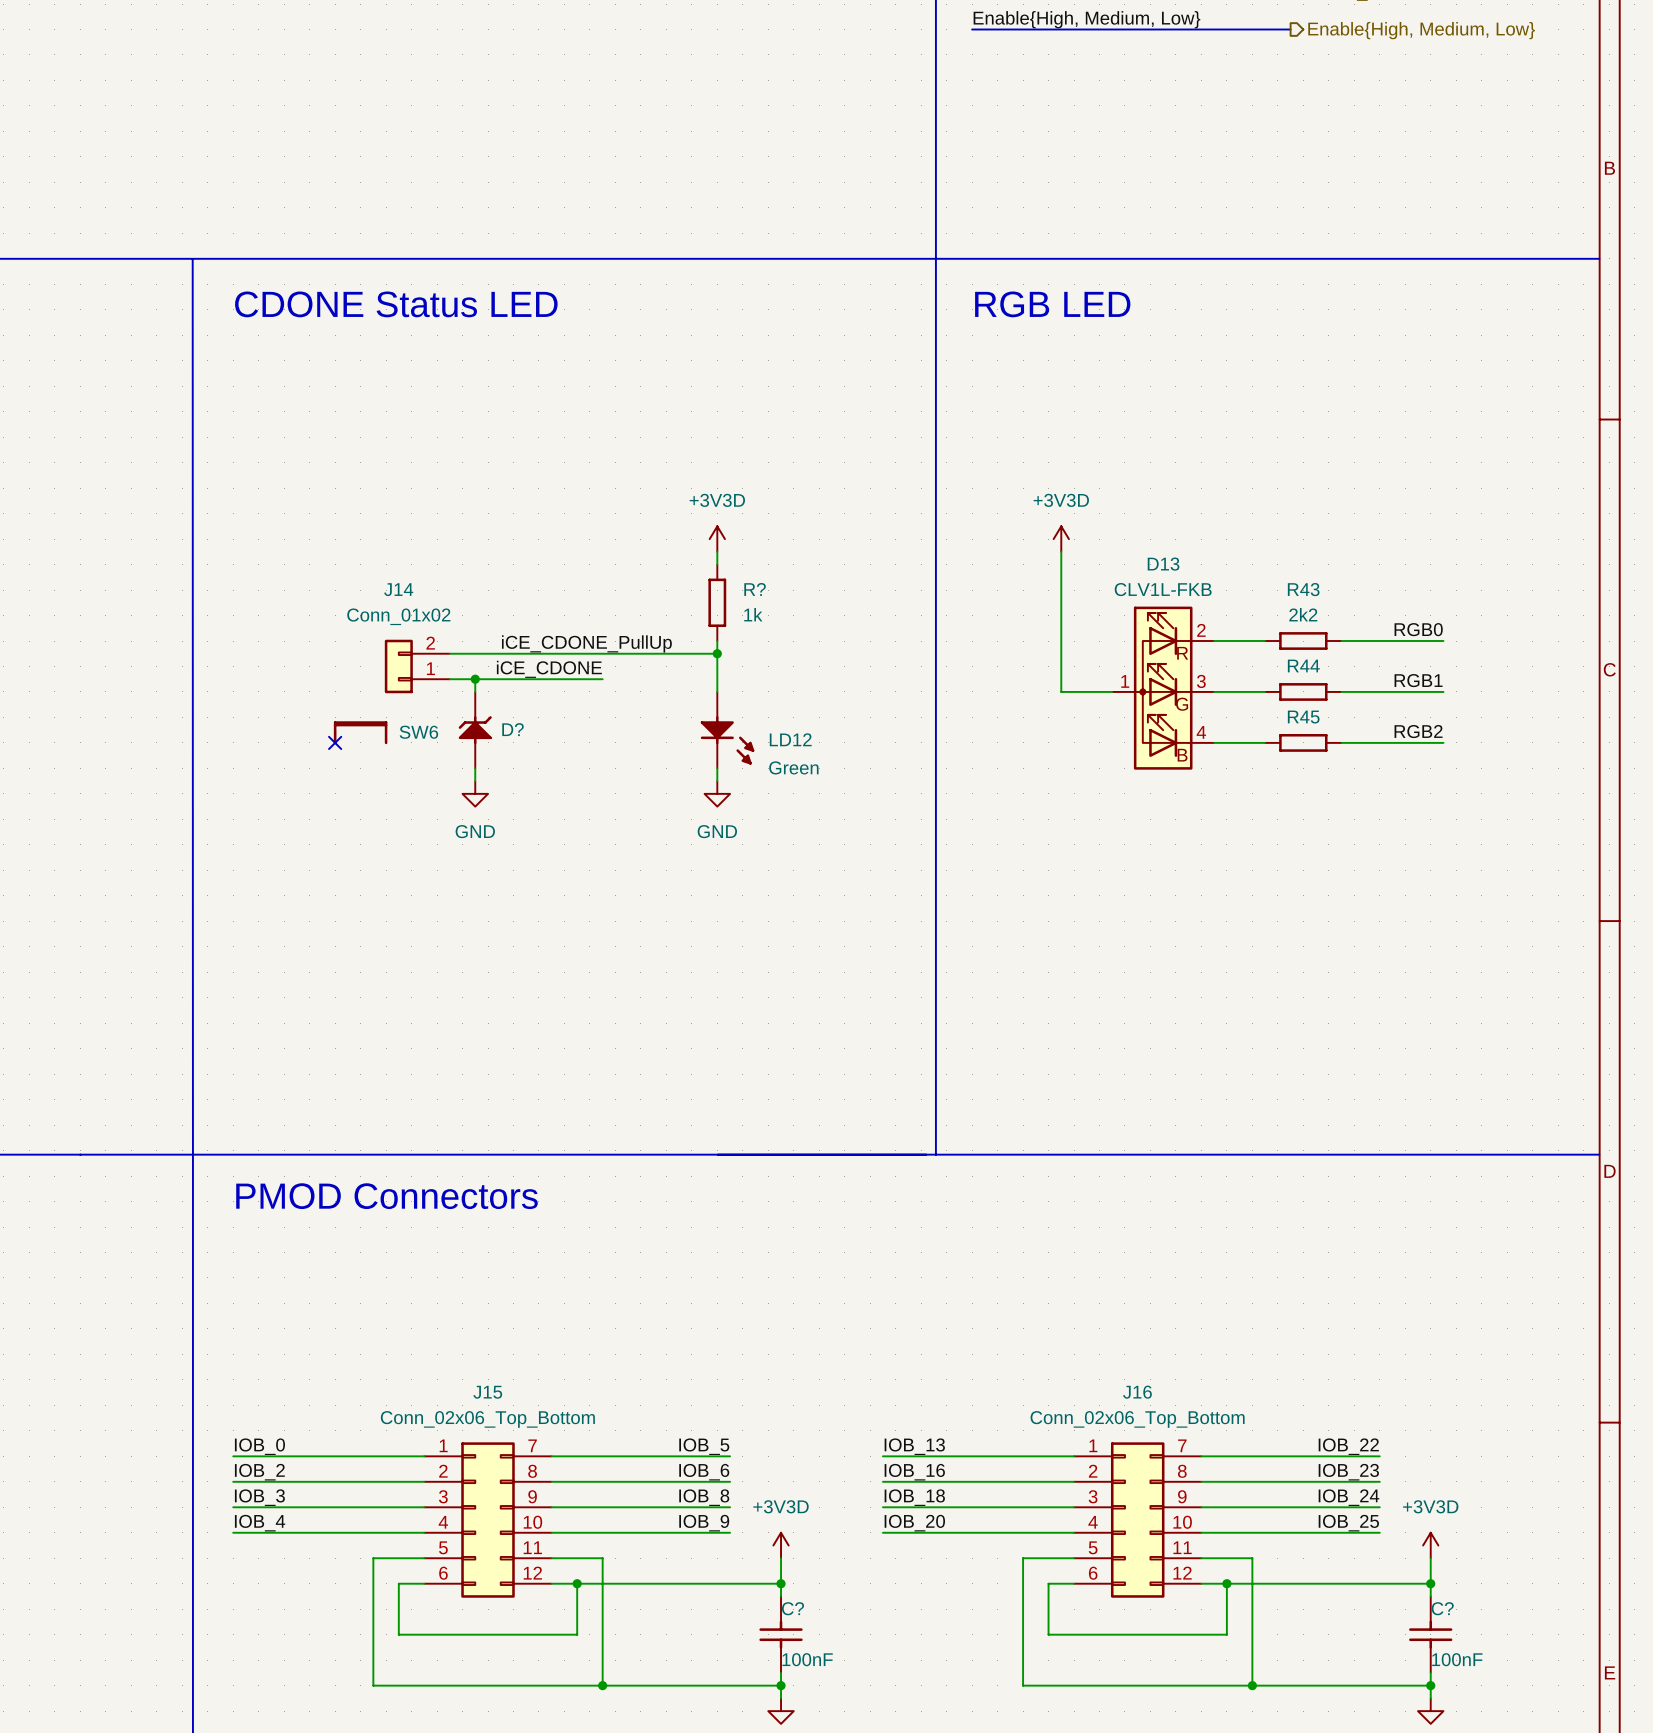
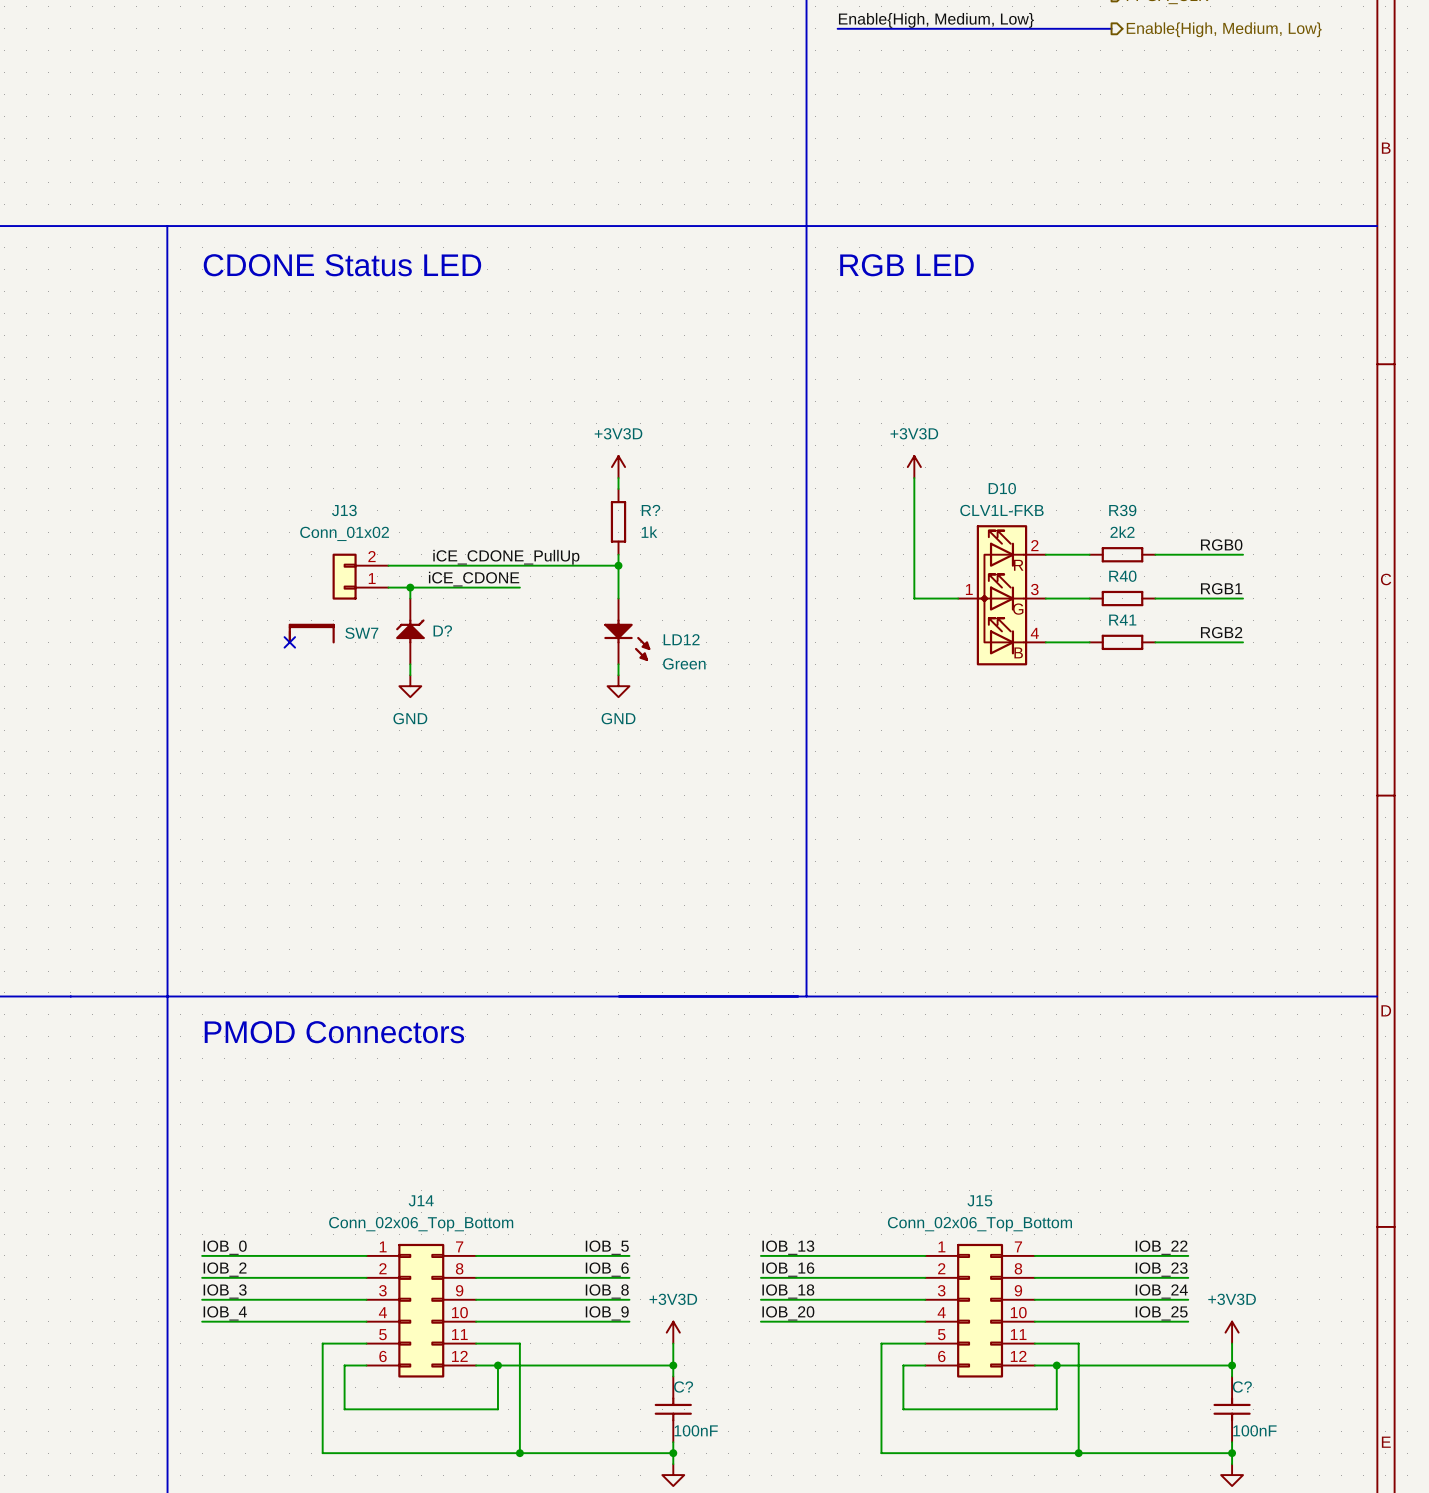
D13 name: D13 (1163, 564) -> D10 (1002, 488)
J14 name: J14 (398, 589) -> J13 (344, 510)
R43 name: R43 (1303, 589) -> R39 (1122, 510)
R44 name: R44 (1303, 666) -> R40 (1122, 576)
R45 name: R45 (1303, 717) -> R41 (1122, 620)
SW6 name: SW6 (418, 732) -> SW7 (361, 633)
J15 name: J15 (487, 1392) -> J14 (421, 1200)
J16 name: J16 (1137, 1392) -> J15 (979, 1200)

